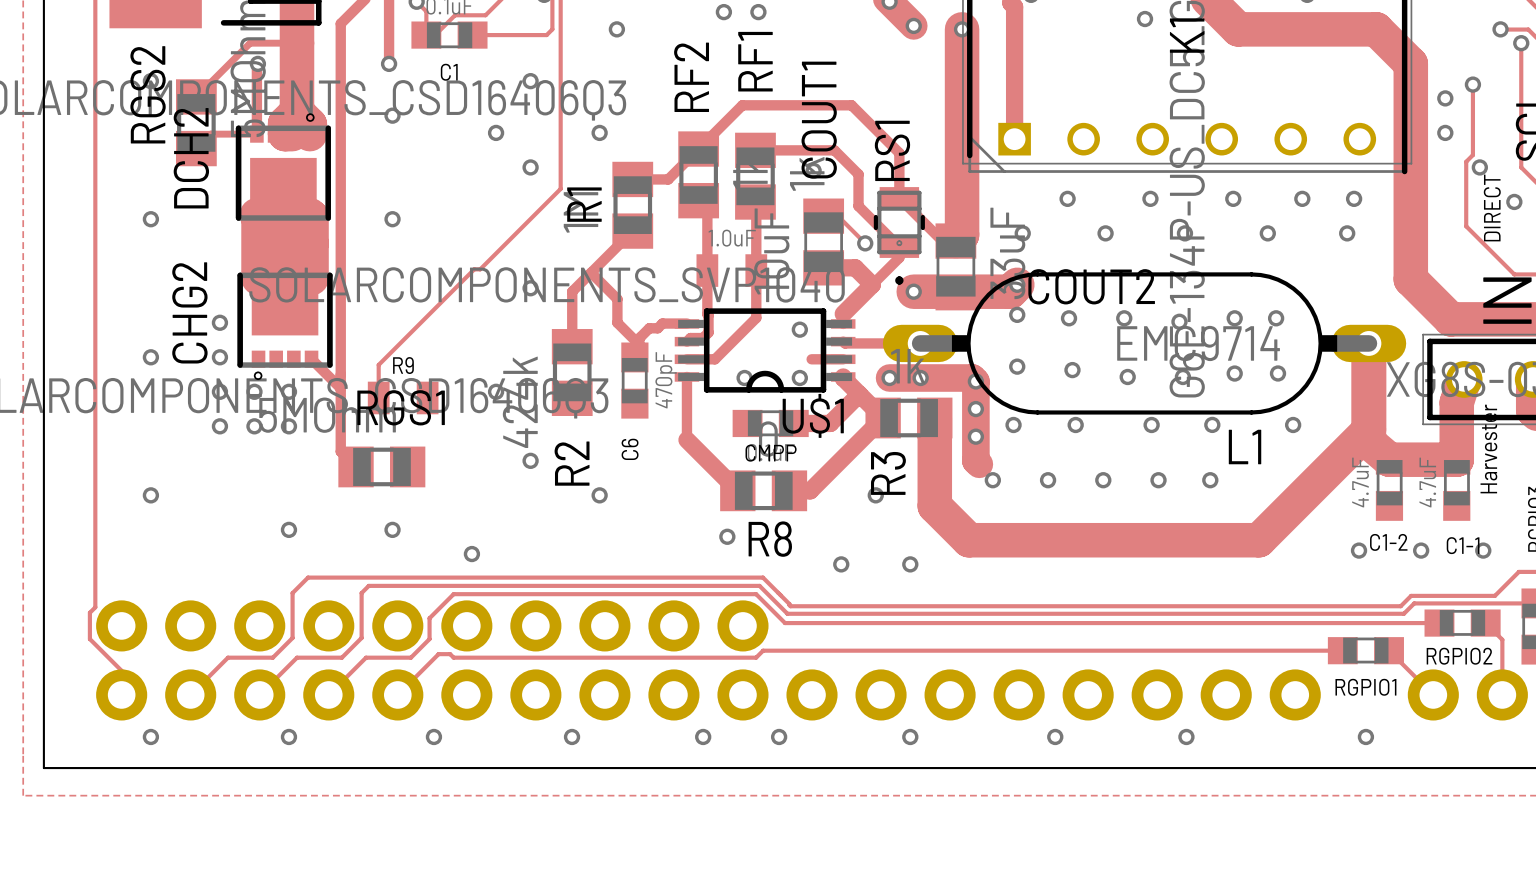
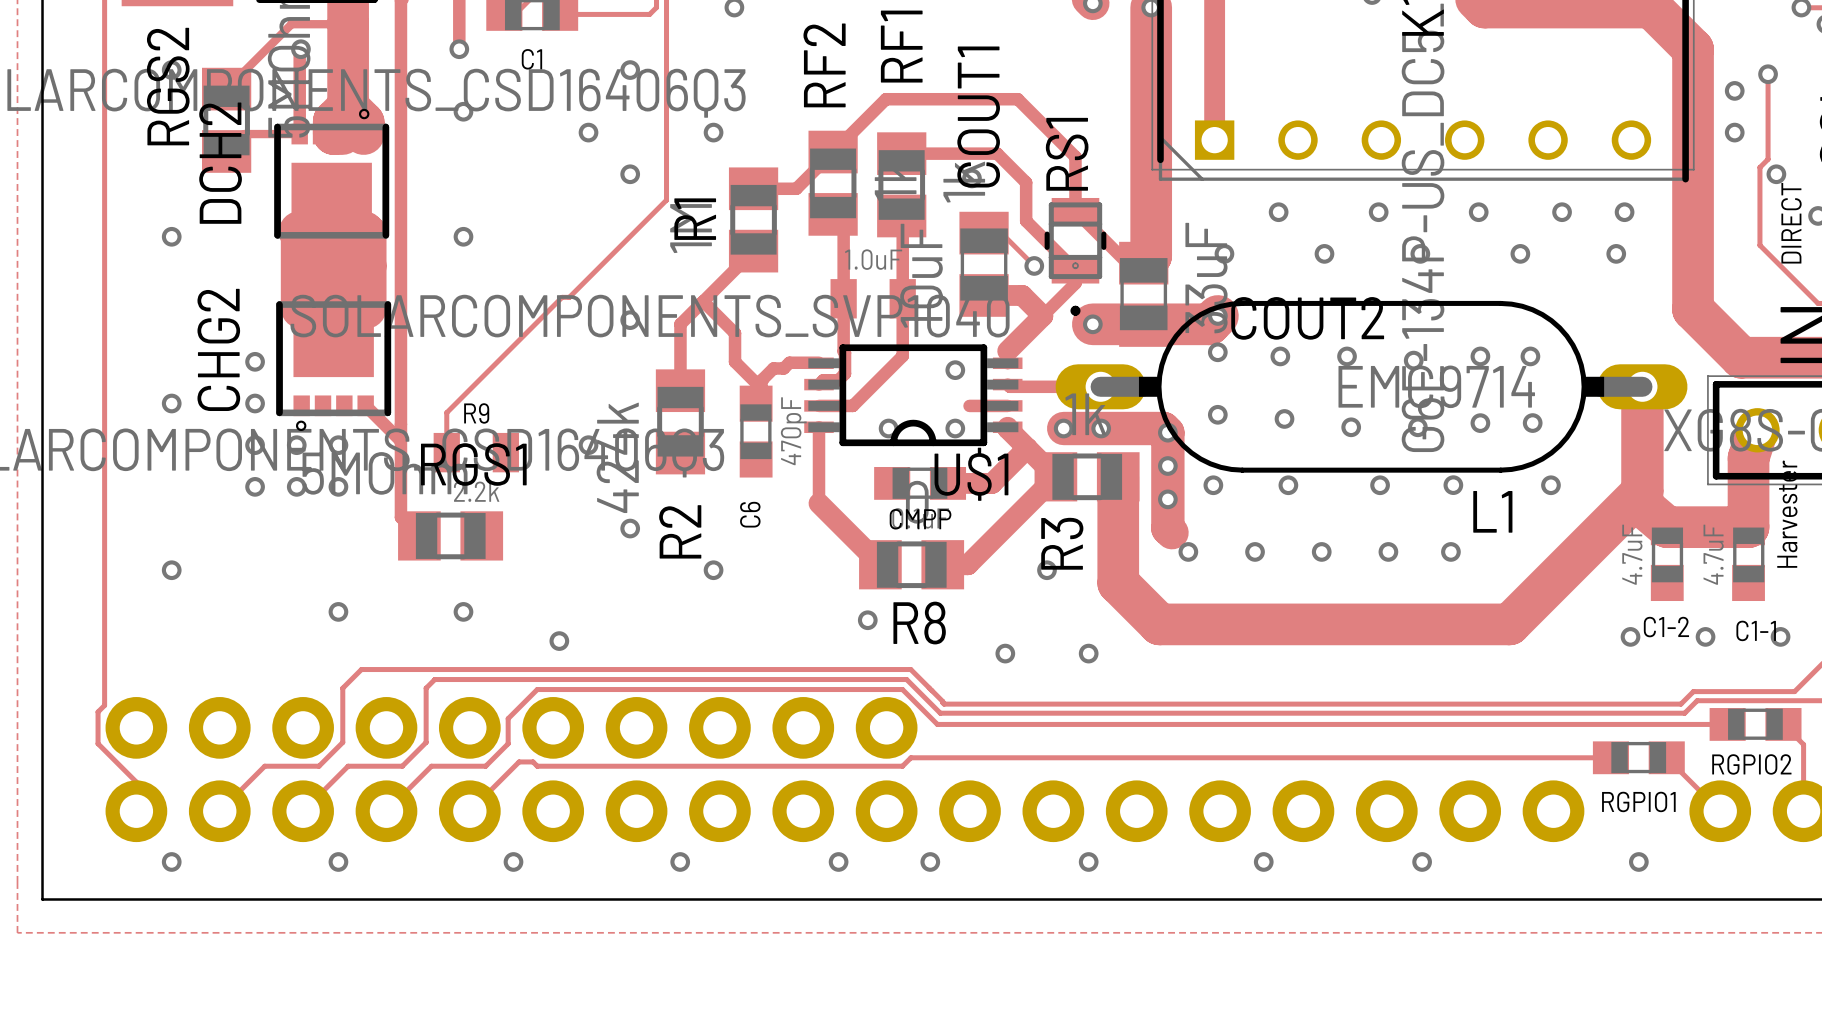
R9 value: none -> 2.2k (476, 491)

